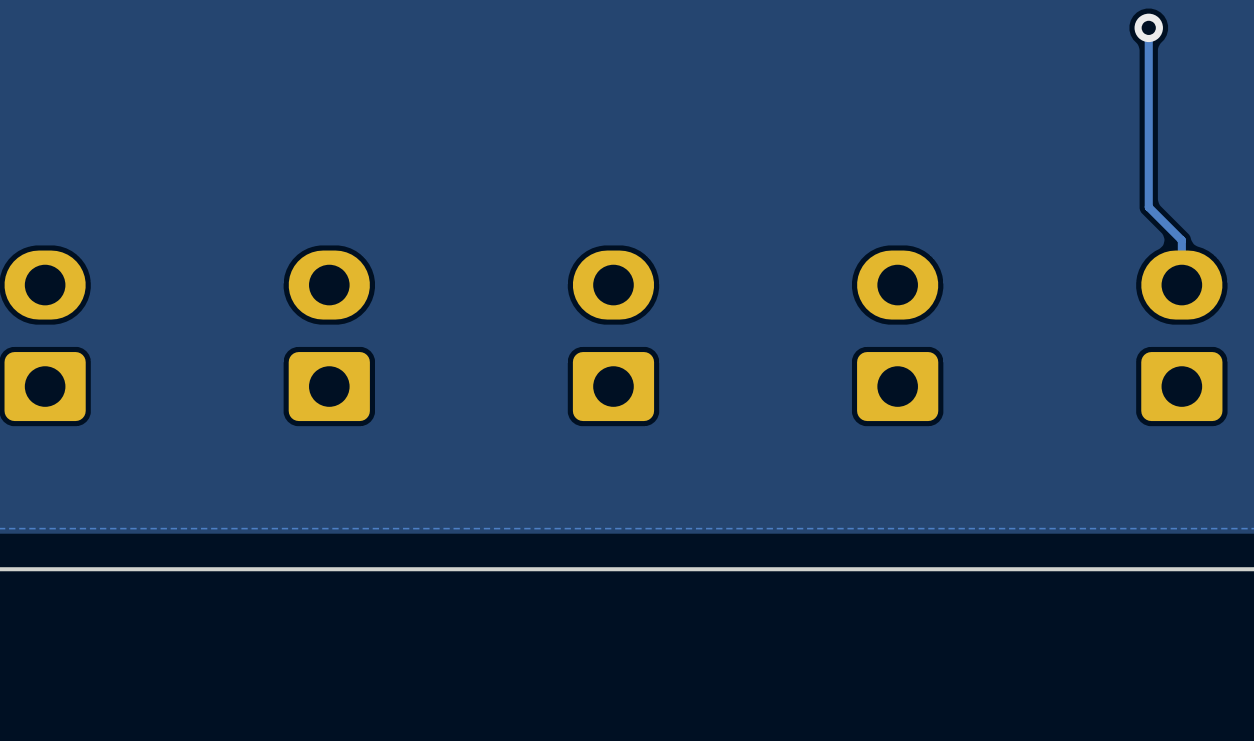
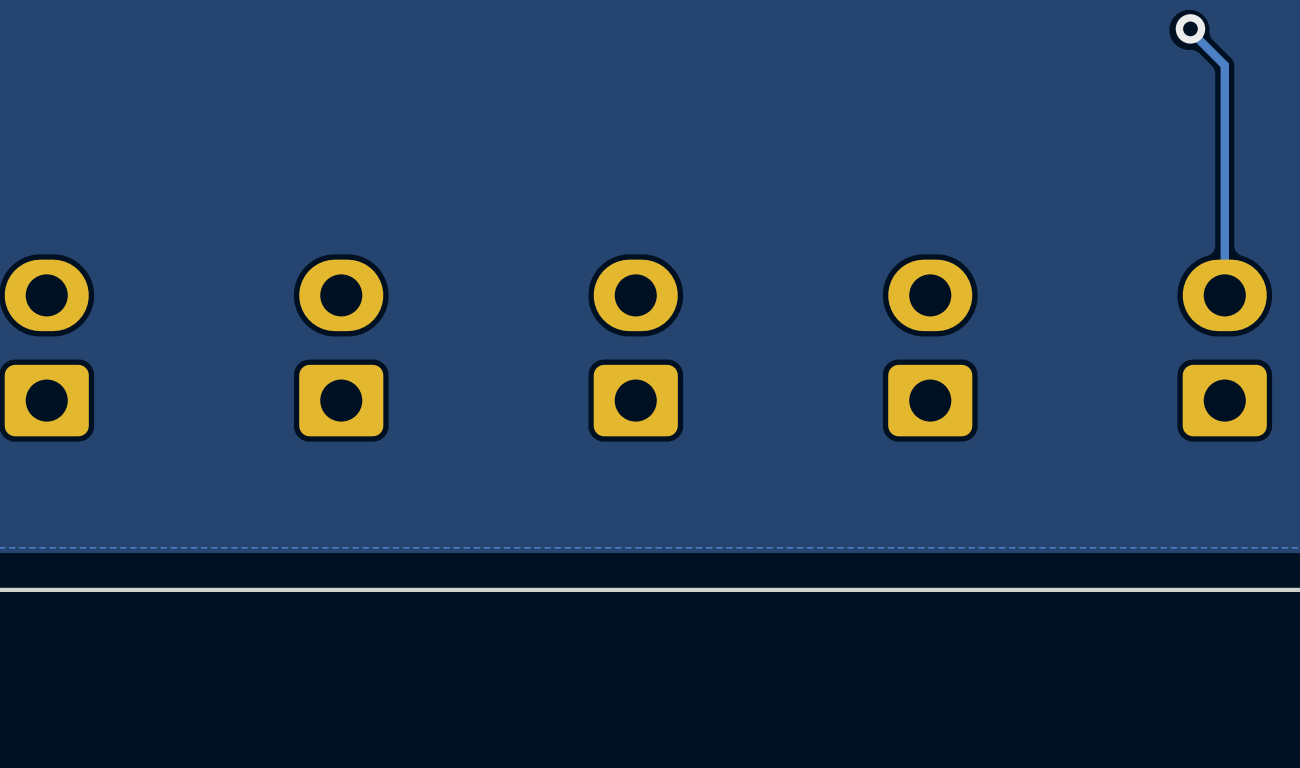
track: (1148, 27) (1148, 207) (1181, 240) -> (1189, 29) (1224, 65) (1224, 249)

